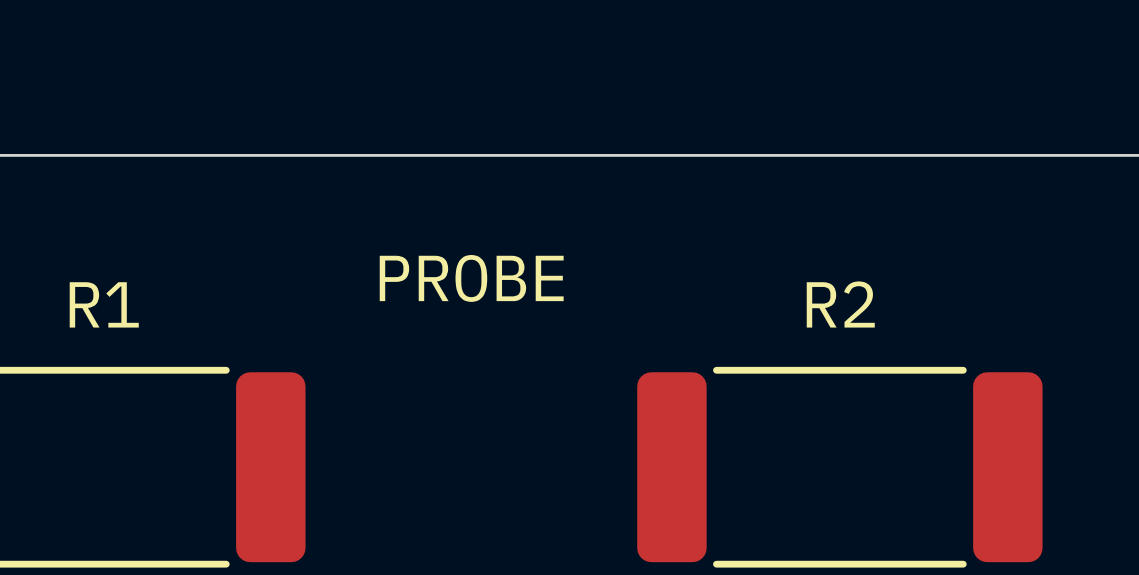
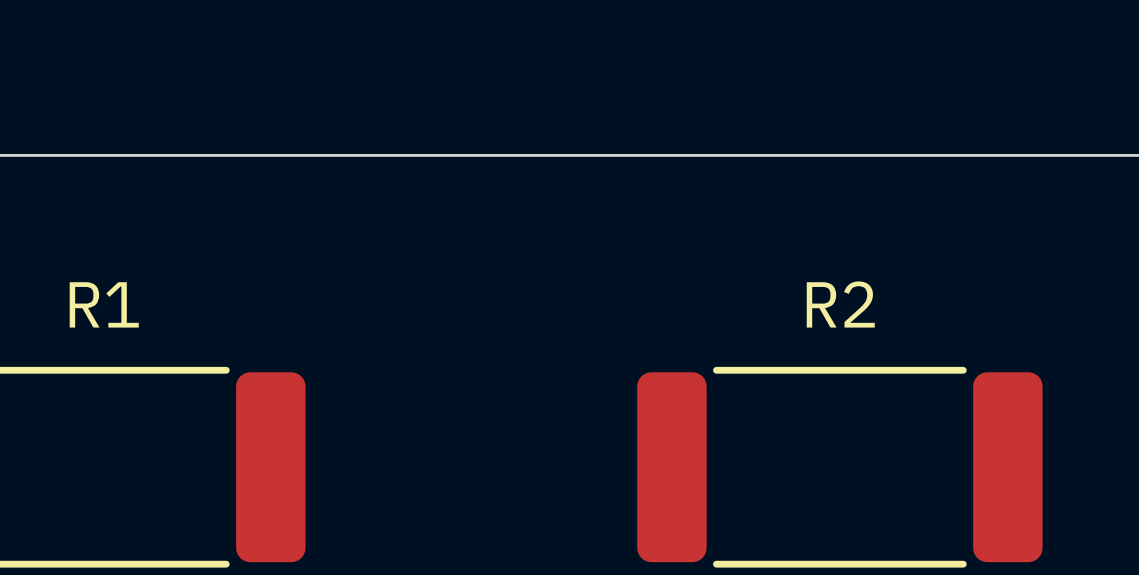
text: PROBE (471, 278) -> none

